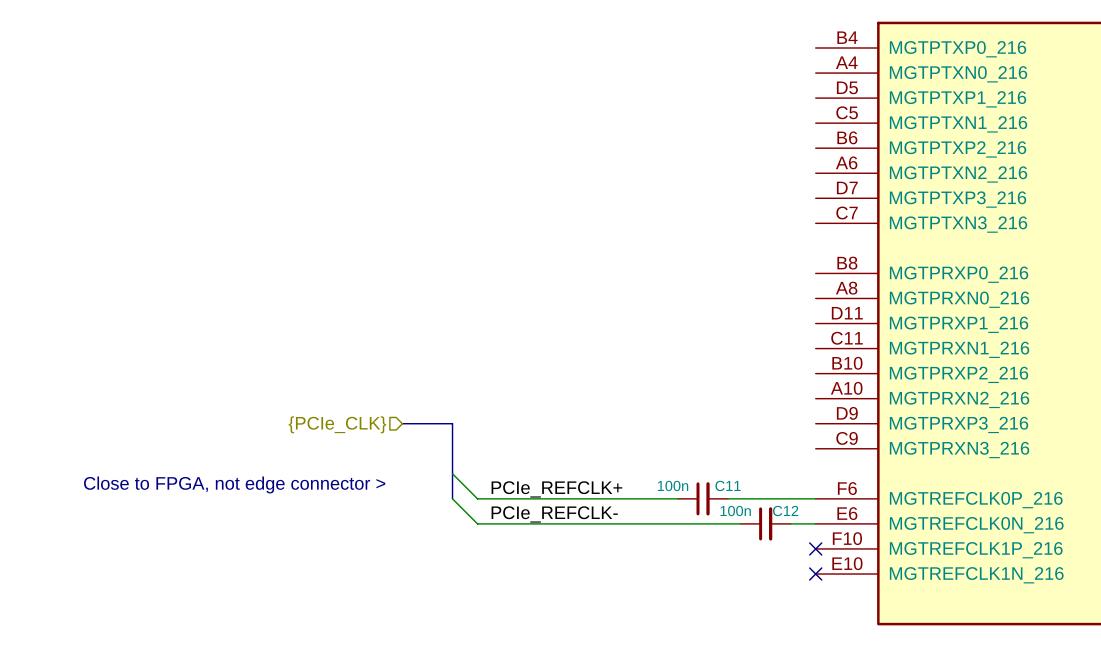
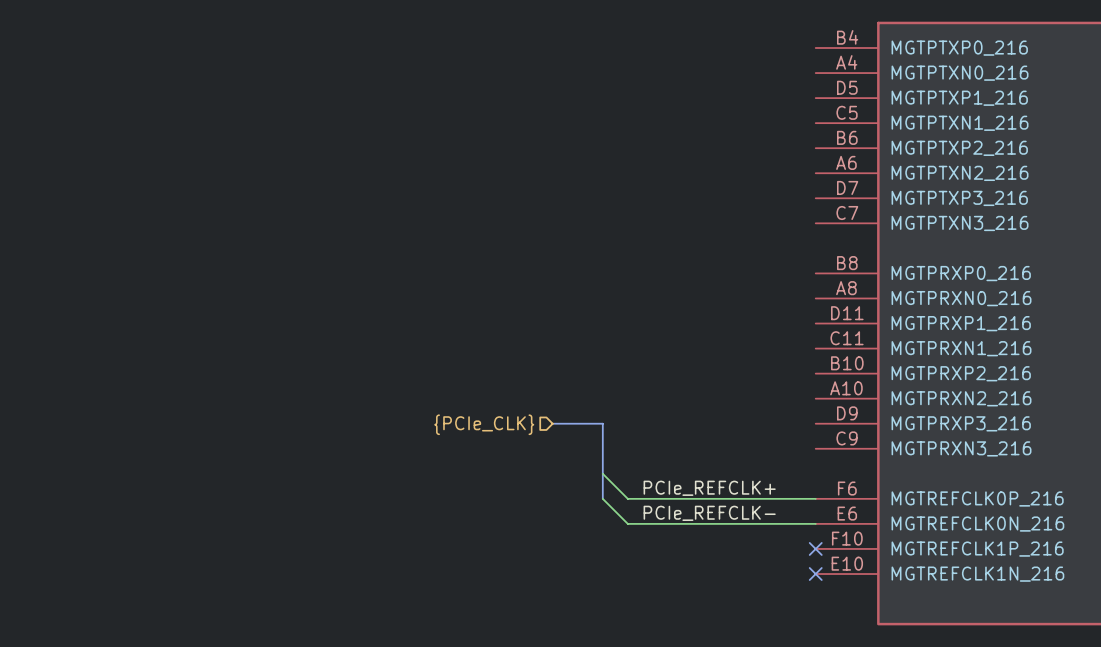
bus: (402, 423) (452, 423) (452, 498) -> (552, 423) (602, 423) (602, 498)
hierarchical label position: {PCIe_CLK} (337, 424) -> {PCIe_CLK} (484, 424)
wire: (452, 473) (477, 498) (627, 498) -> (602, 473) (627, 498)
text: Close to FPGA, not edge connector > (234, 484) -> none
label position: PCIe_REFCLK+ (556, 489) -> PCIe_REFCLK+ (709, 488)
wire: (452, 498) (477, 523) (627, 523) -> (602, 498) (627, 523)
C11: 100n (703, 498) -> none
label position: PCIe_REFCLK- (554, 514) -> PCIe_REFCLK- (709, 513)
C12: 100n (765, 523) -> none

